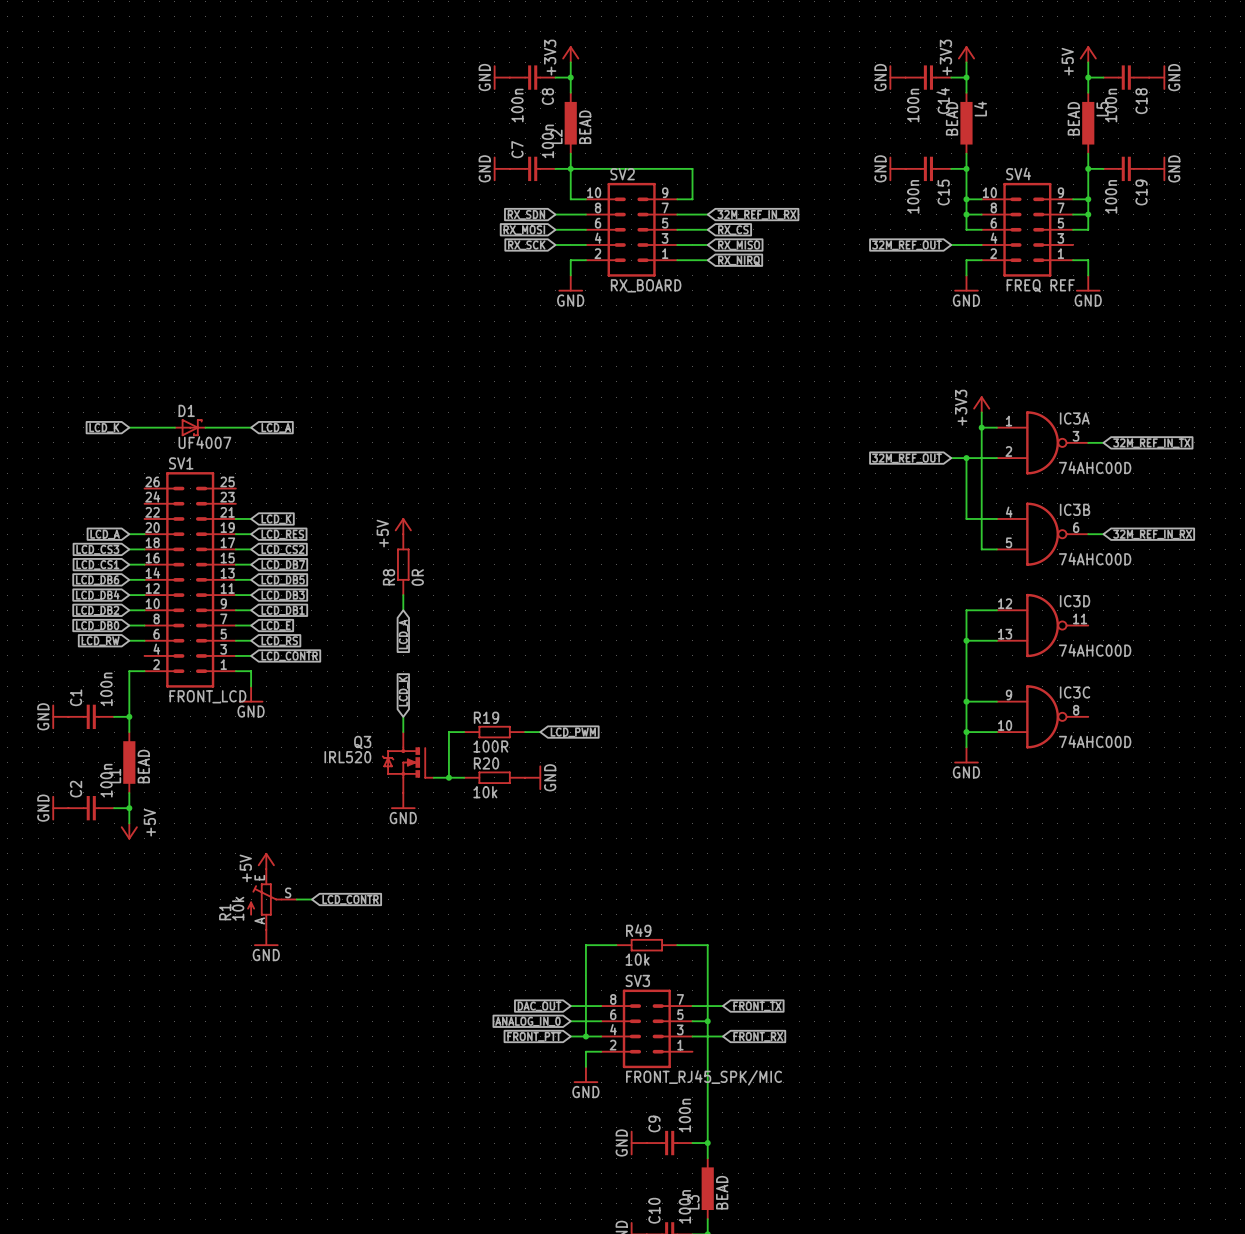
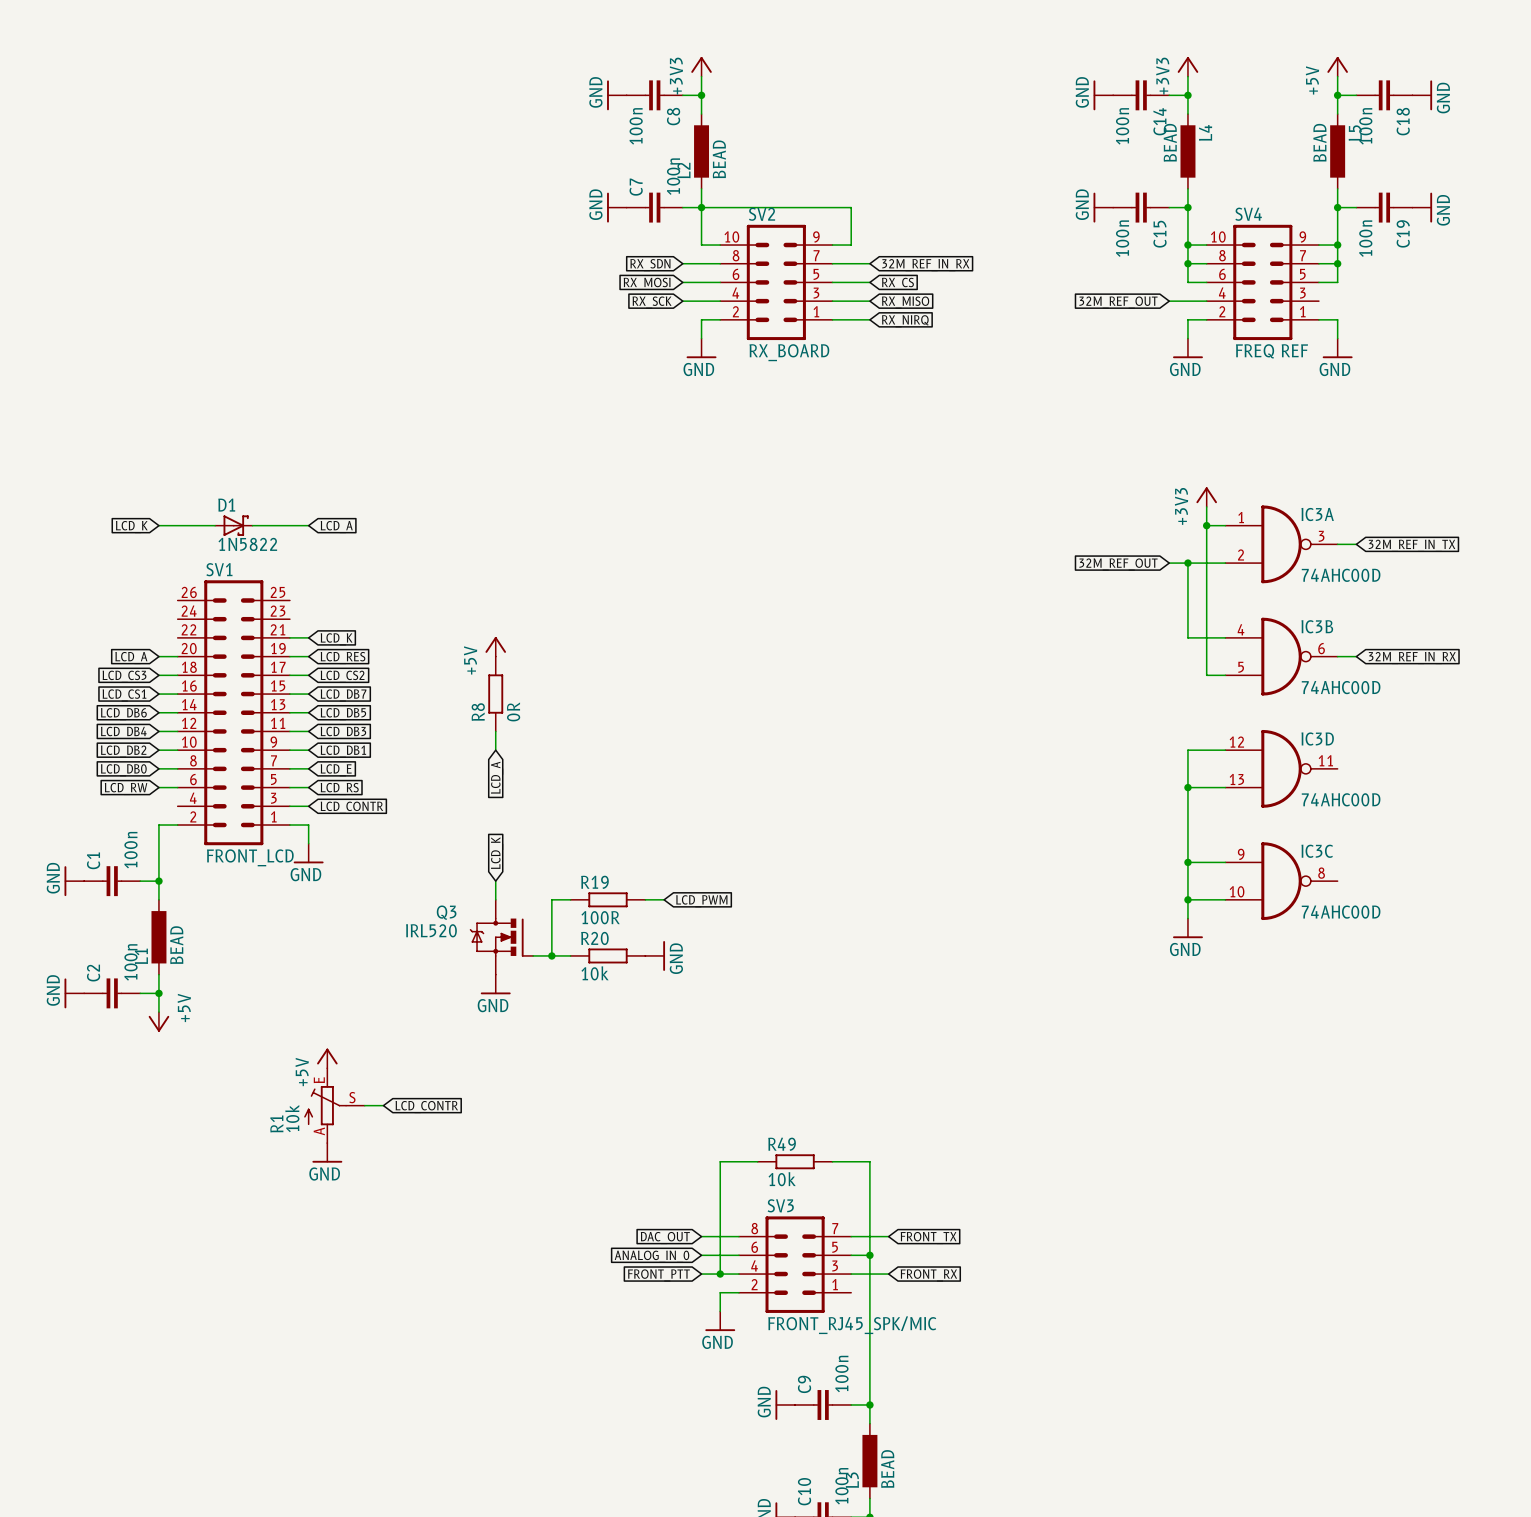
D1 value: UF4007 (204, 442) -> 1N5822 (247, 544)

